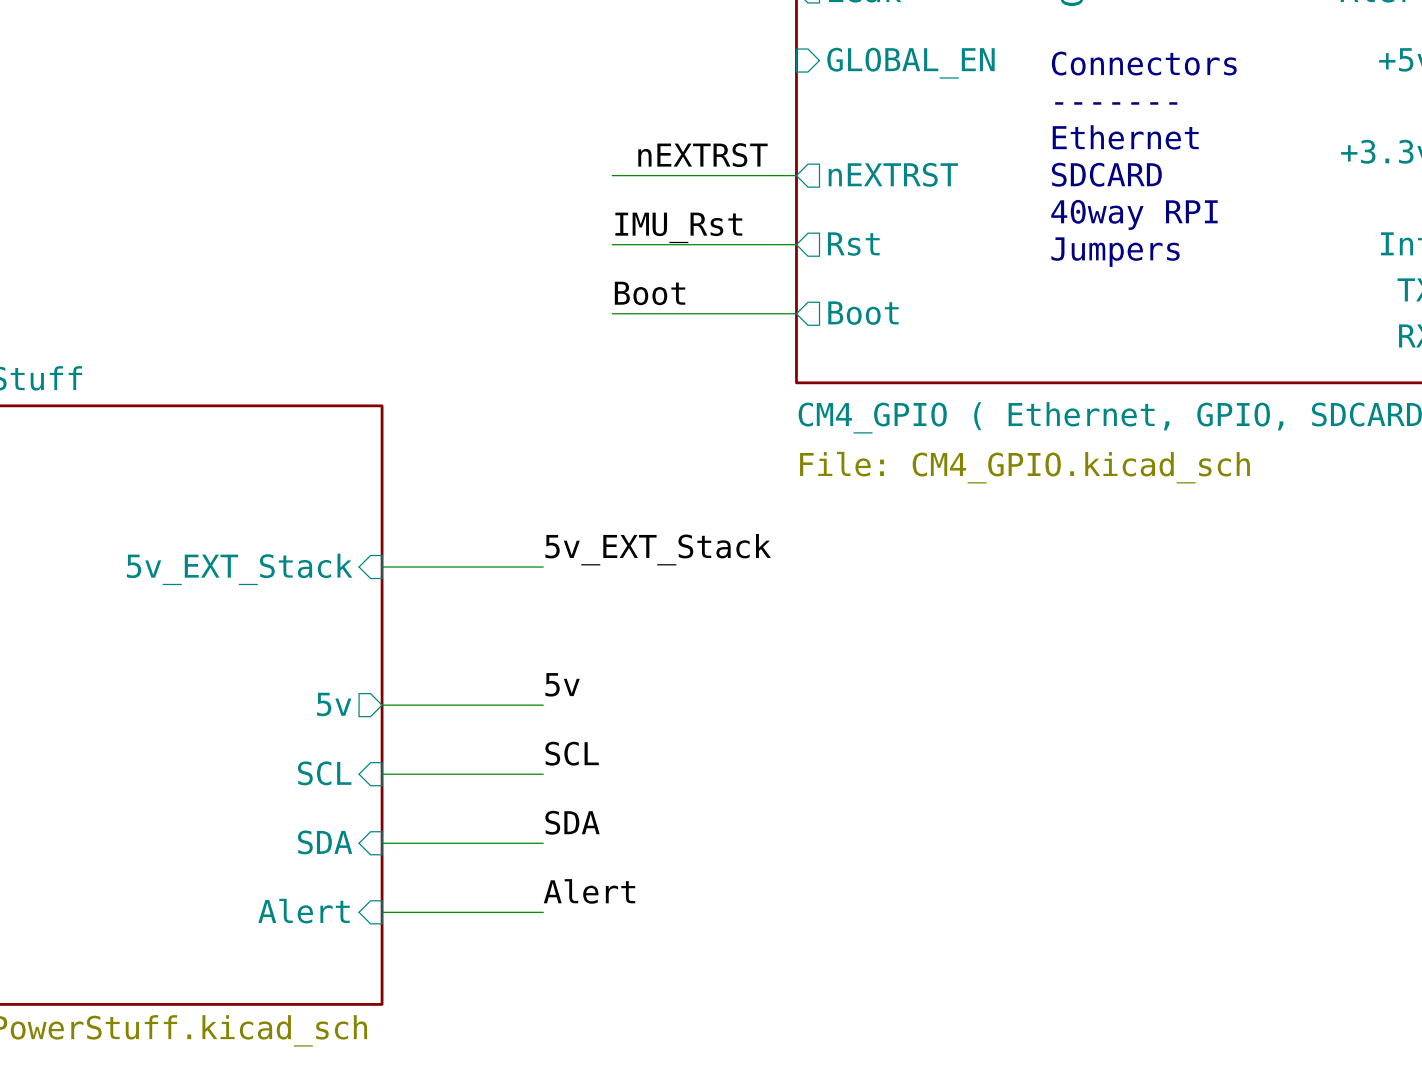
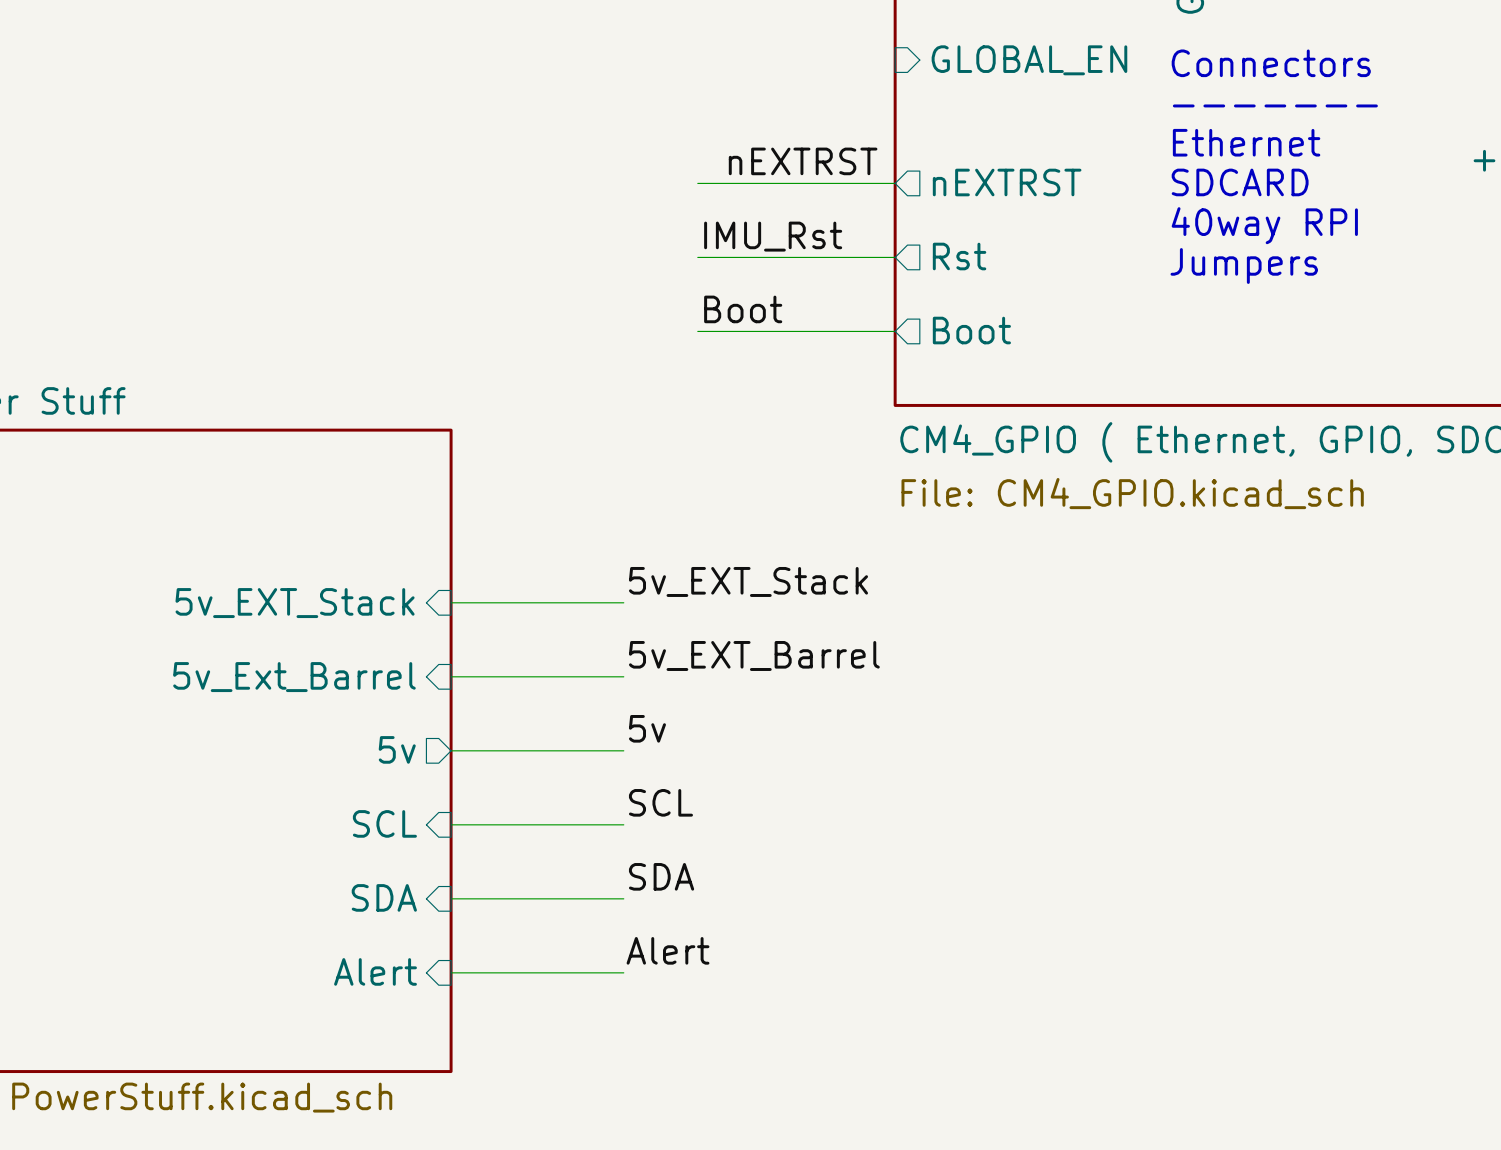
label: none -> 5v_EXT_Barrel (754, 655)
wire: none -> (451, 676) (623, 676)
sheet pin: none -> 5v_Ext_Barrel (294, 677)

